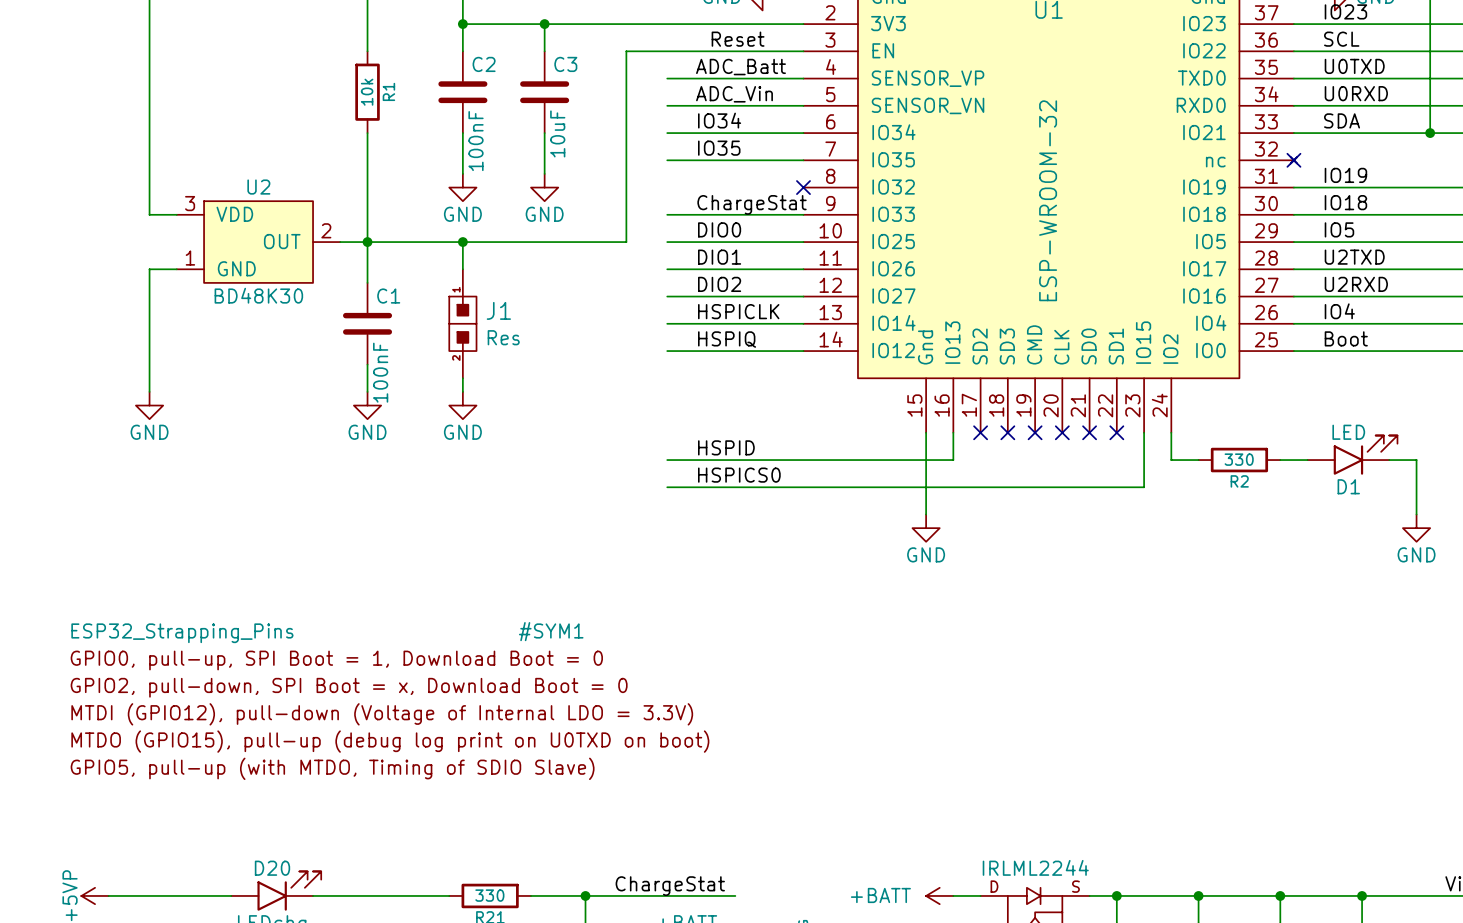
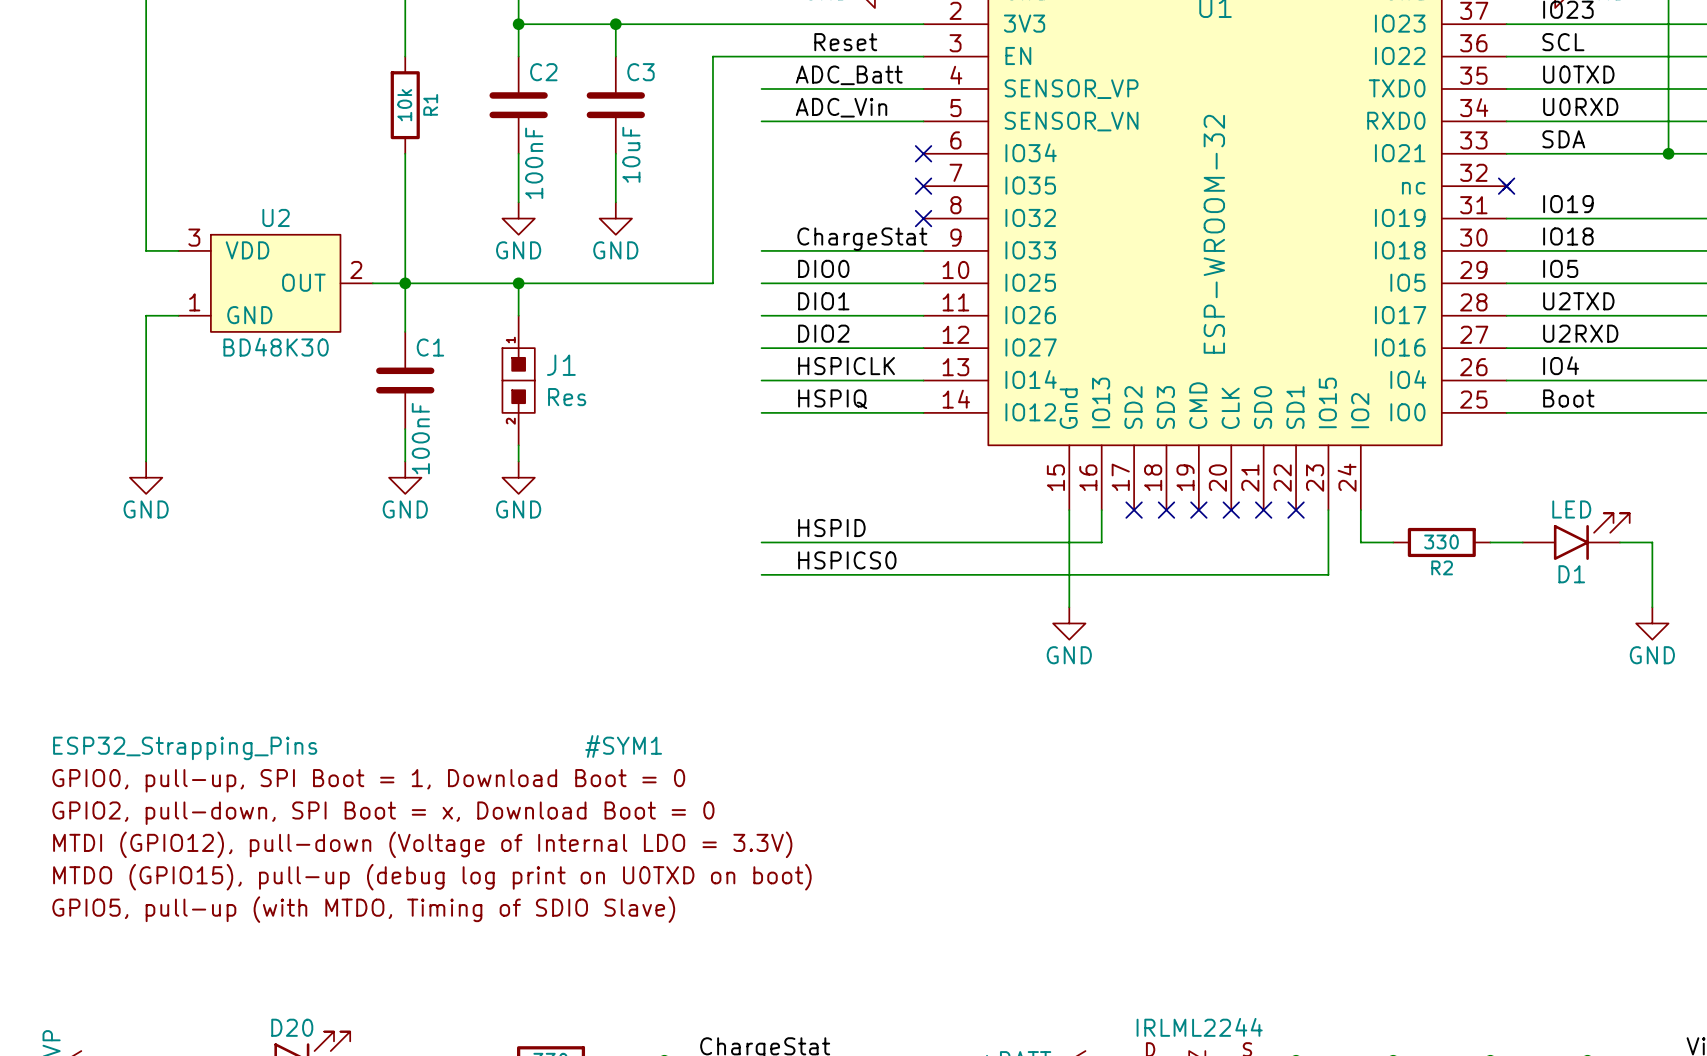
label: IO34 (719, 120) -> none
wire: (667, 133) (803, 133) -> none
no-connect mark: none -> (923, 153)
label: IO35 (719, 148) -> none
wire: (667, 160) (803, 160) -> none
no-connect mark: none -> (923, 186)

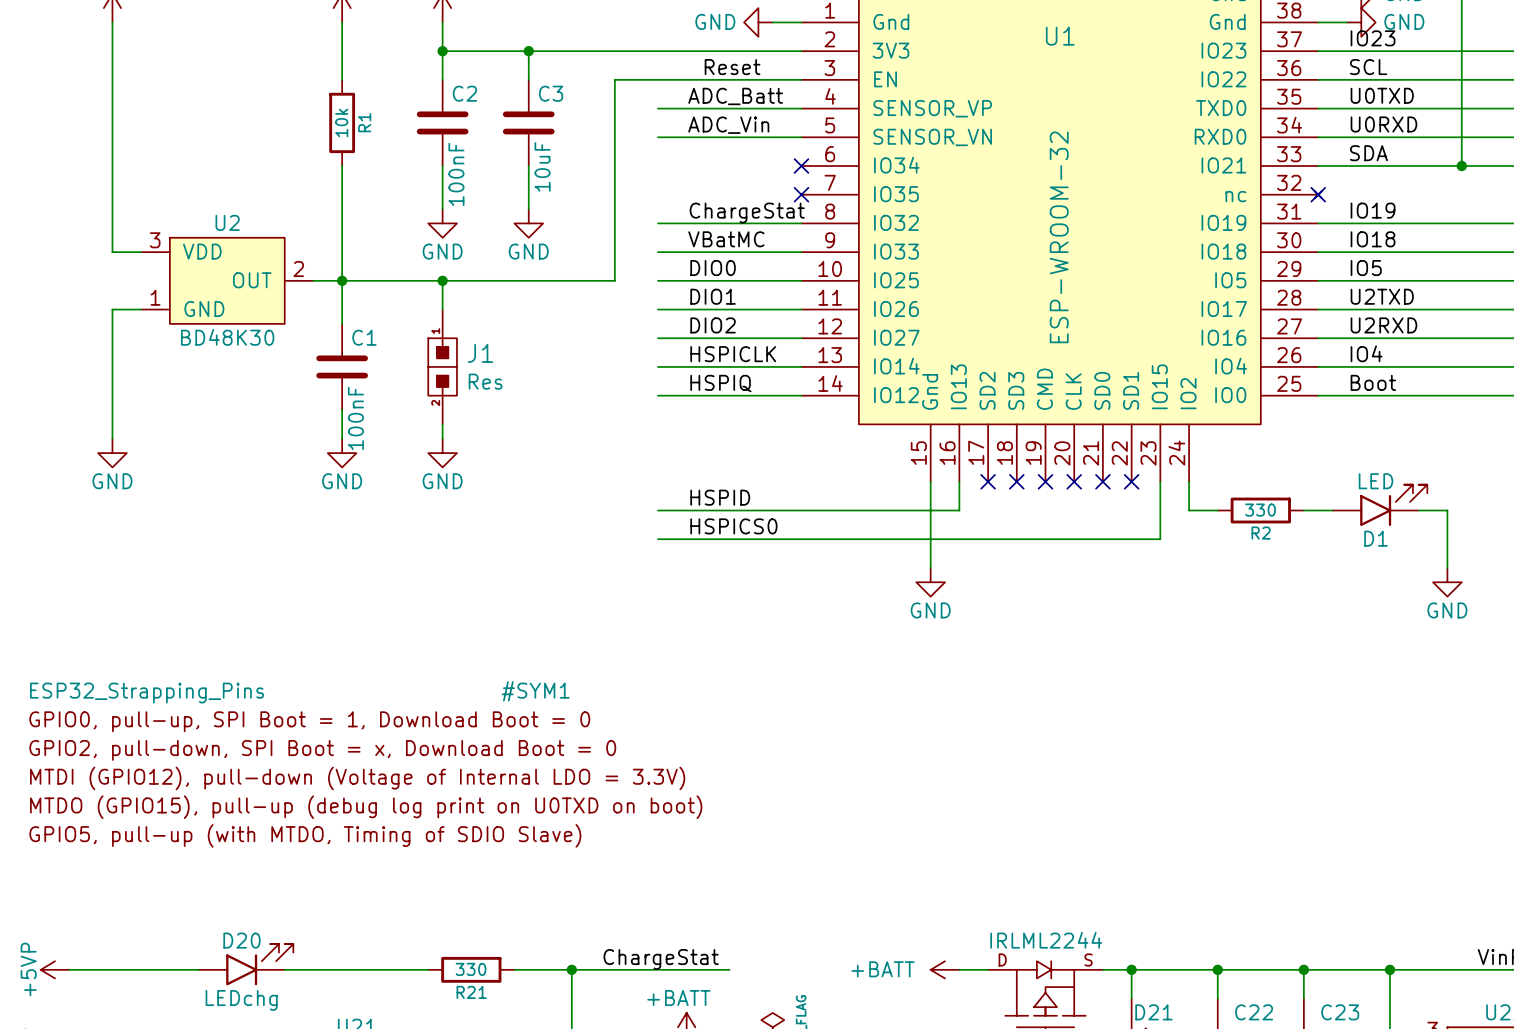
label: none -> ChargeStat (747, 213)
wire: none -> (657, 223) (801, 223)
no-connect mark: (923, 218) -> none
label: ChargeStat (862, 239) -> VBatMC (726, 239)

